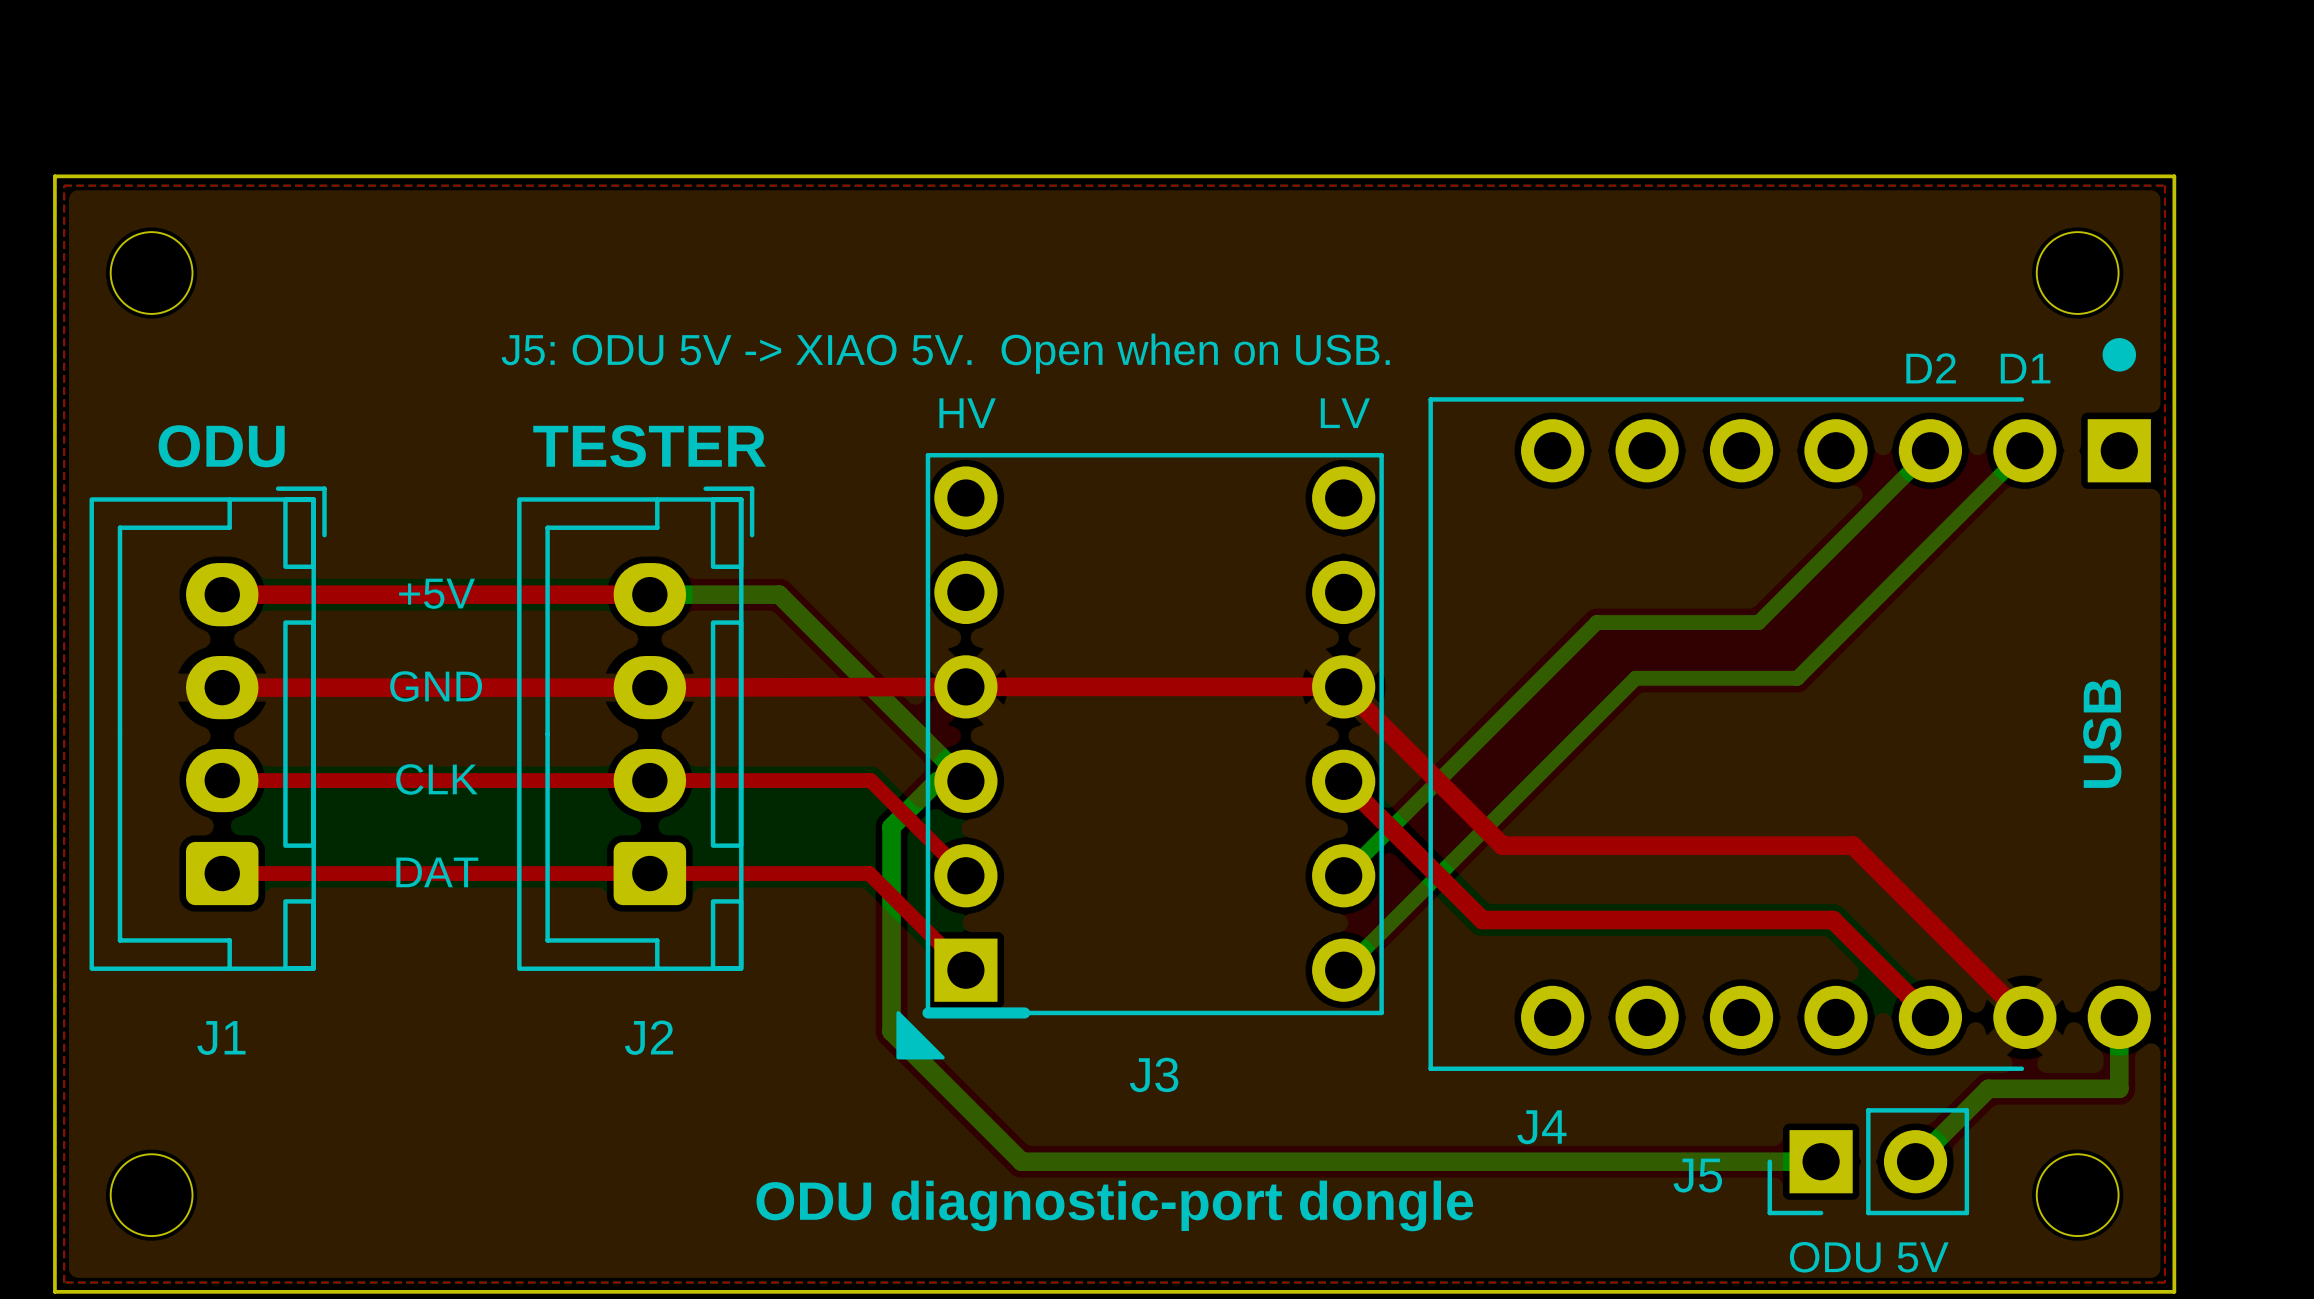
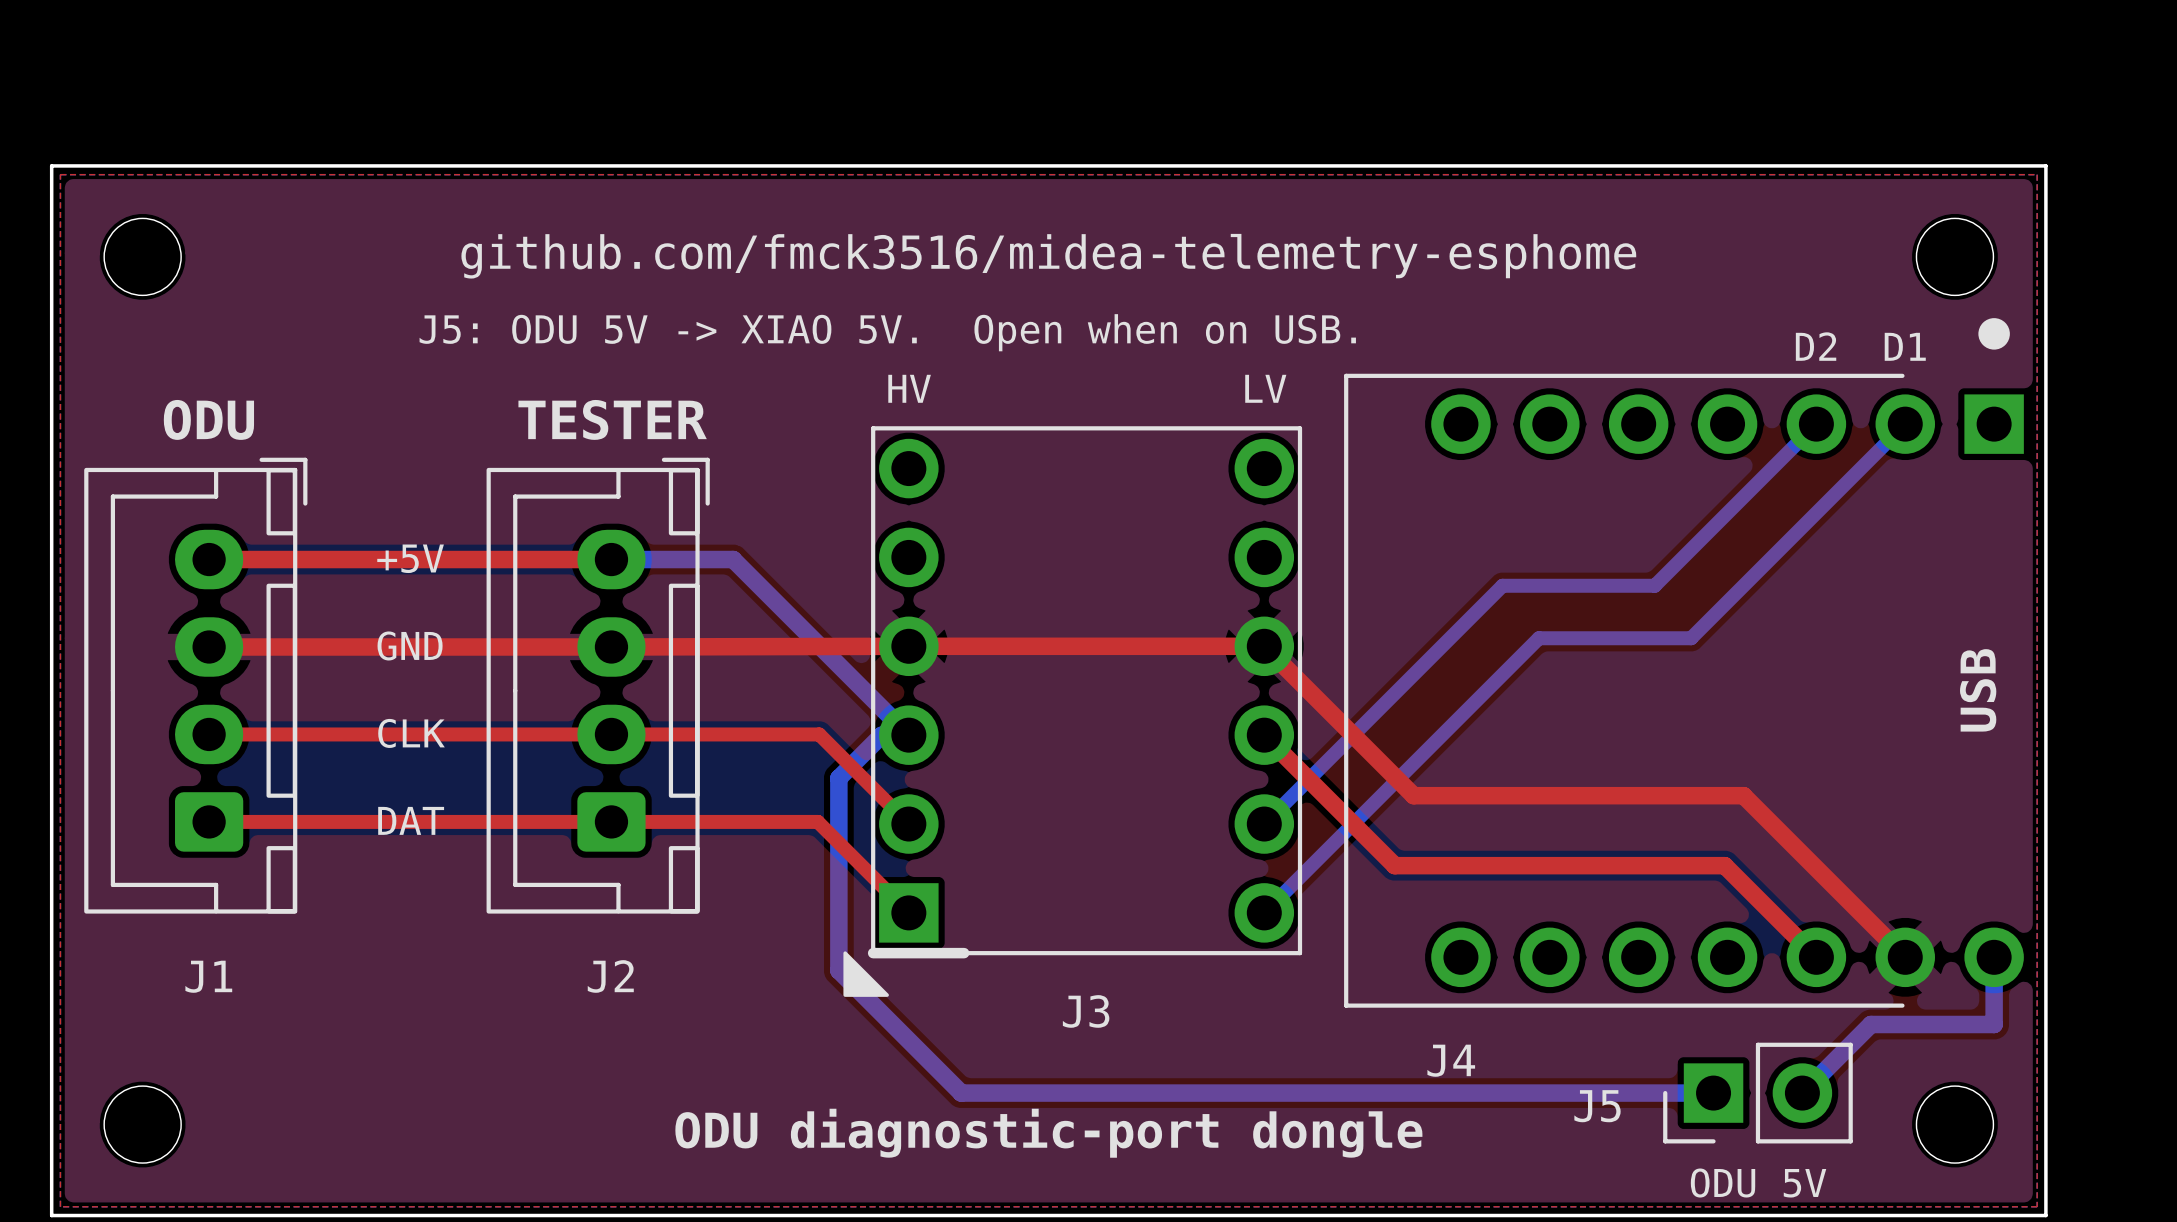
text: none -> github.com/fmck3516/midea-telemetry-esphome (1048, 256)

